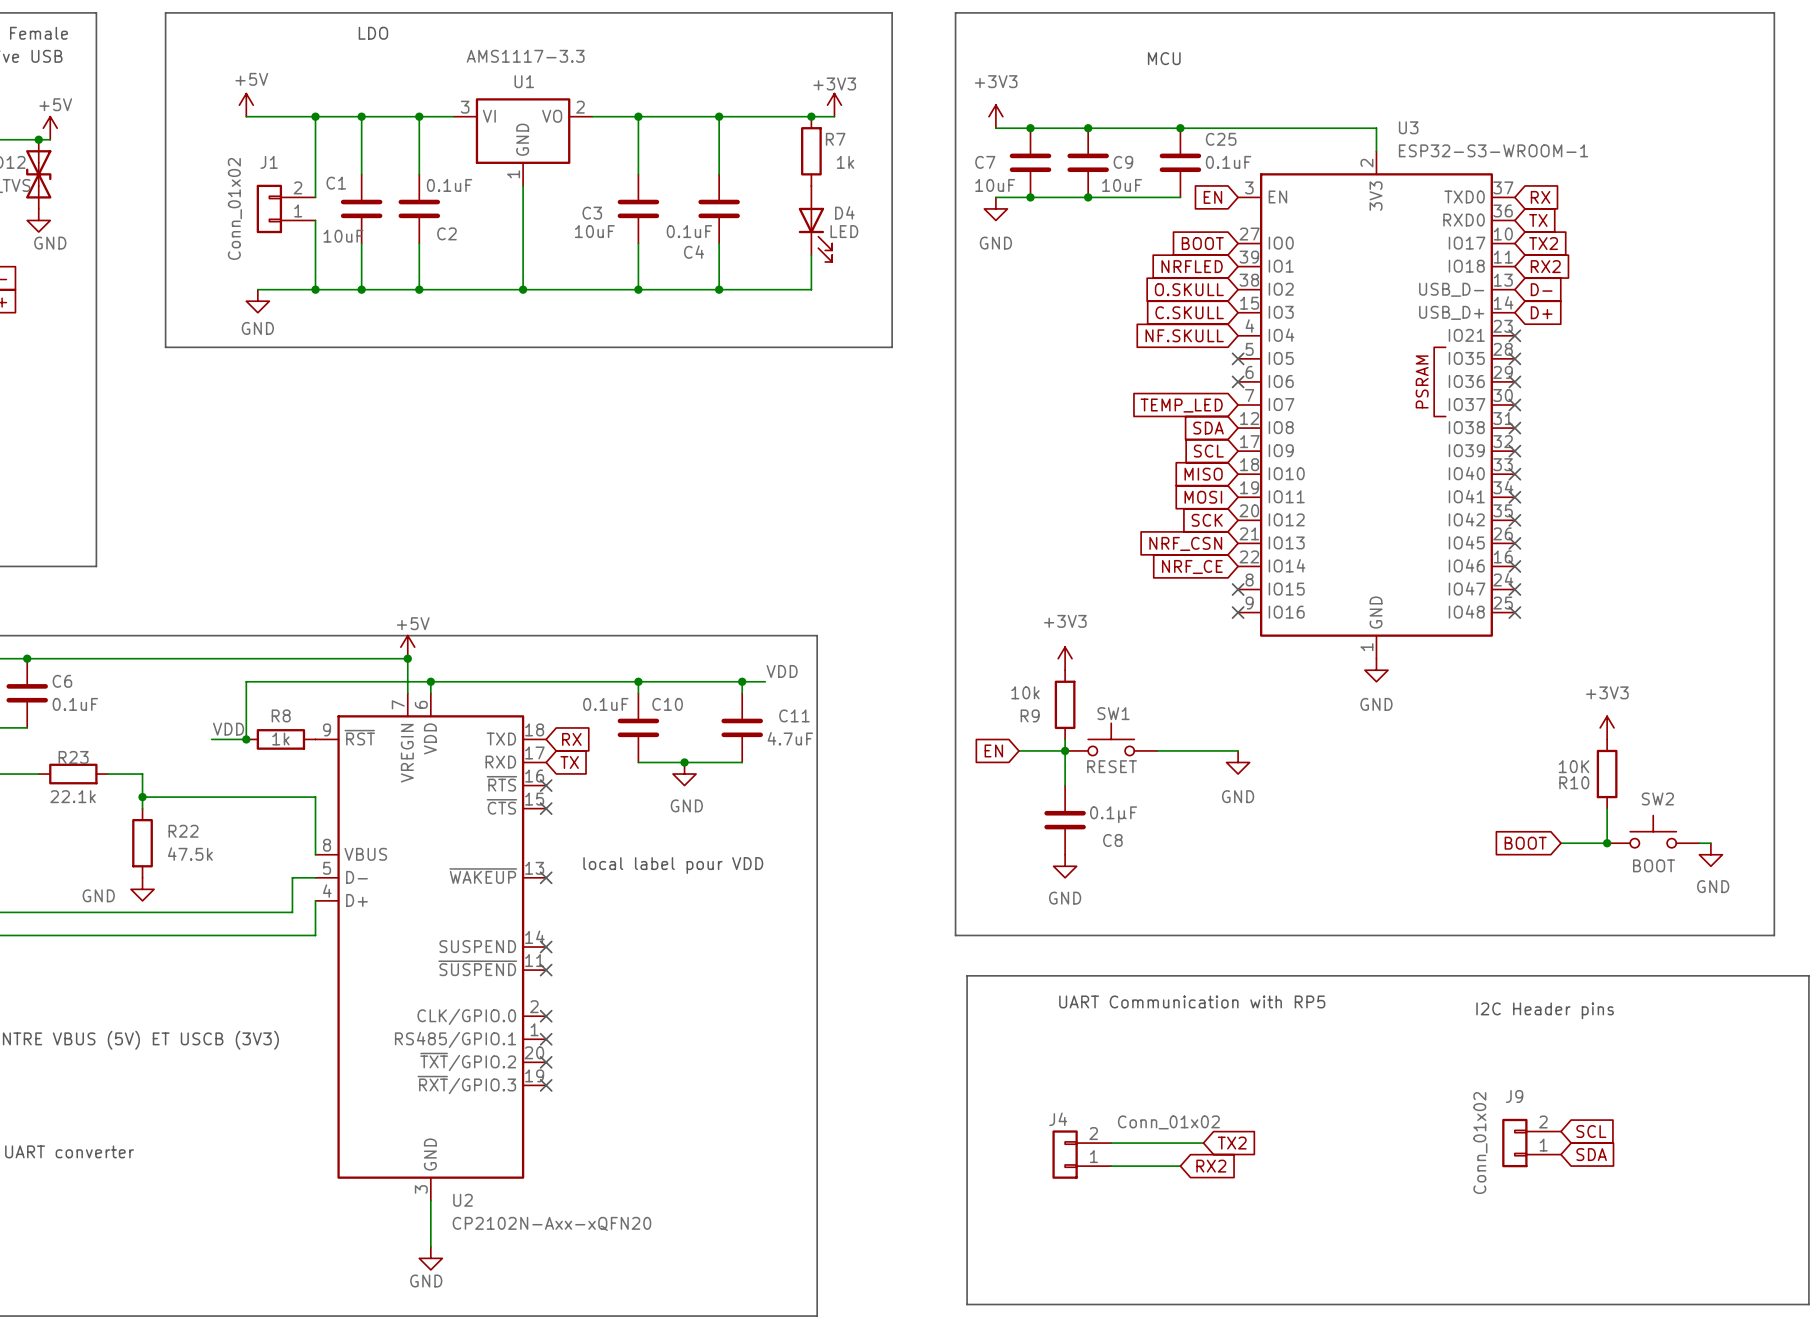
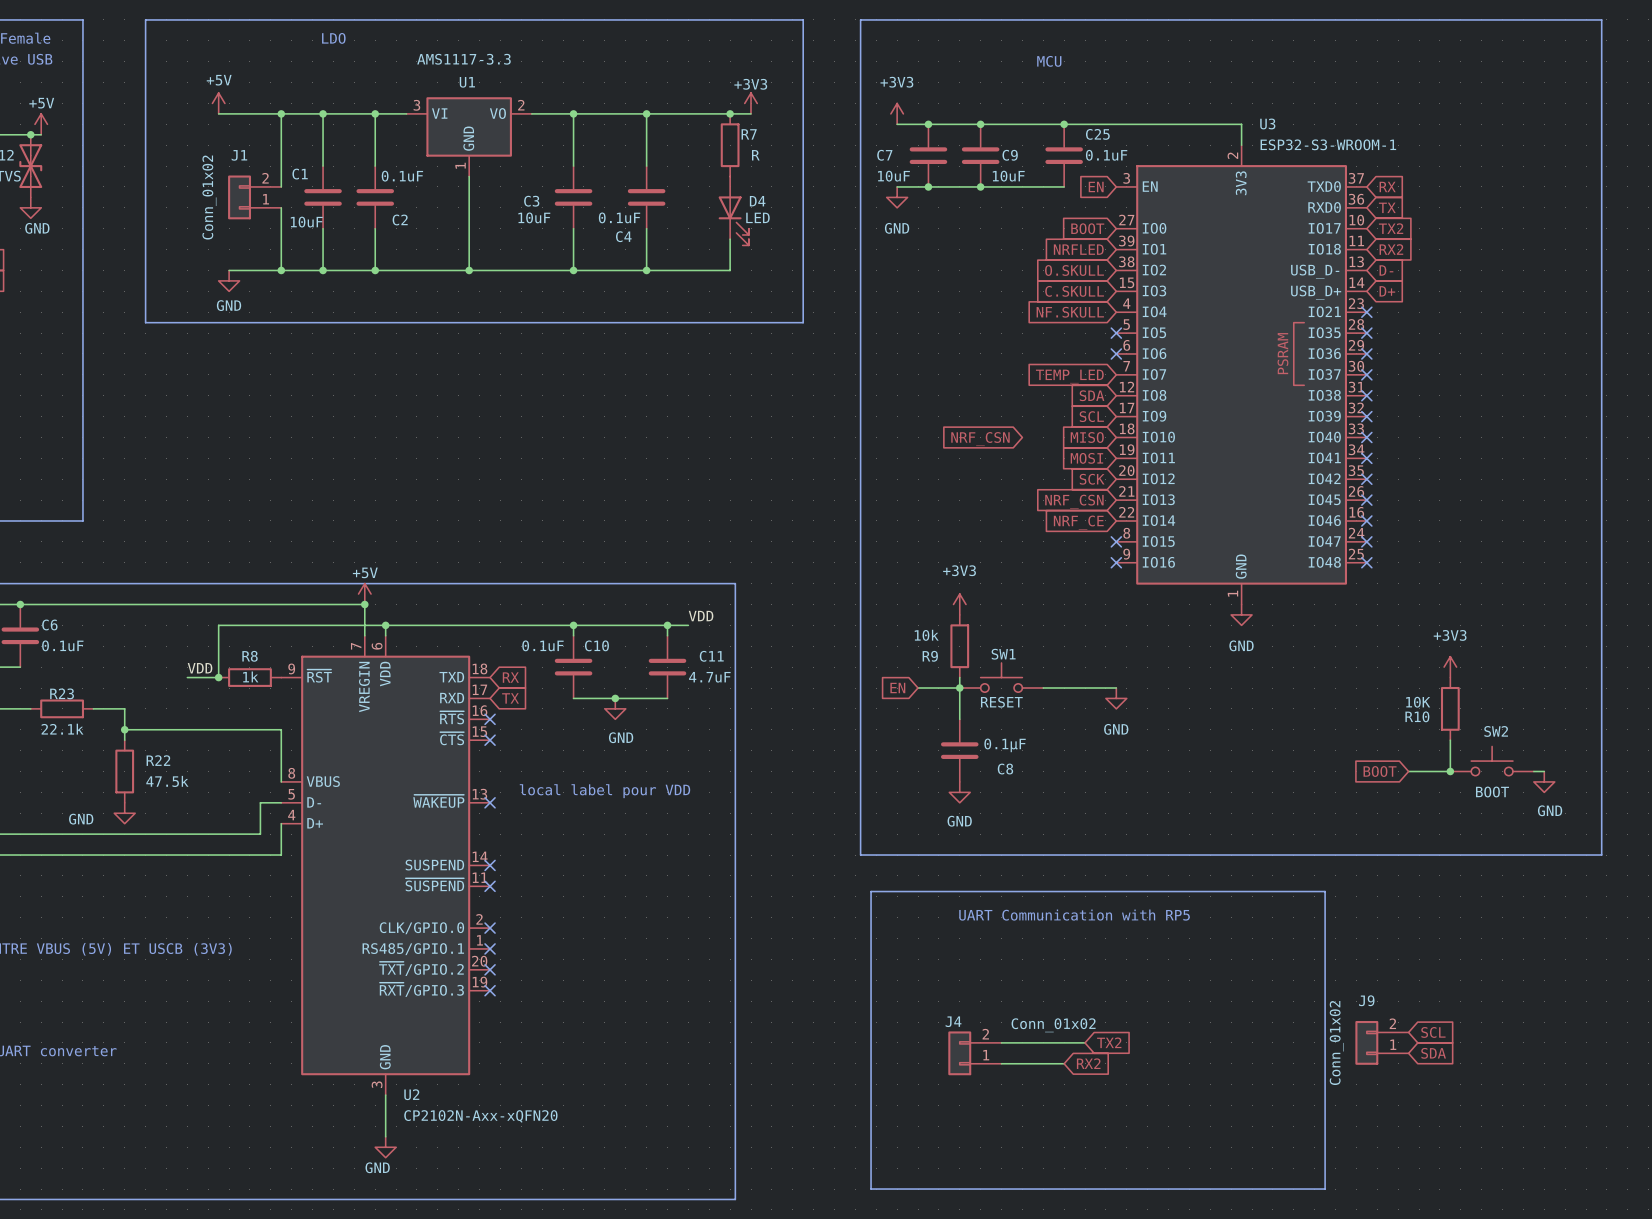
R7 value: 1k (845, 162) -> R (755, 155)
global label: none -> NRF_CSN (980, 439)
line: (1468, 975) (1808, 975) (1808, 1304) (1468, 1304) -> (1325, 891) (1325, 1189)
text: I2C Header pins (1545, 1010) -> none

